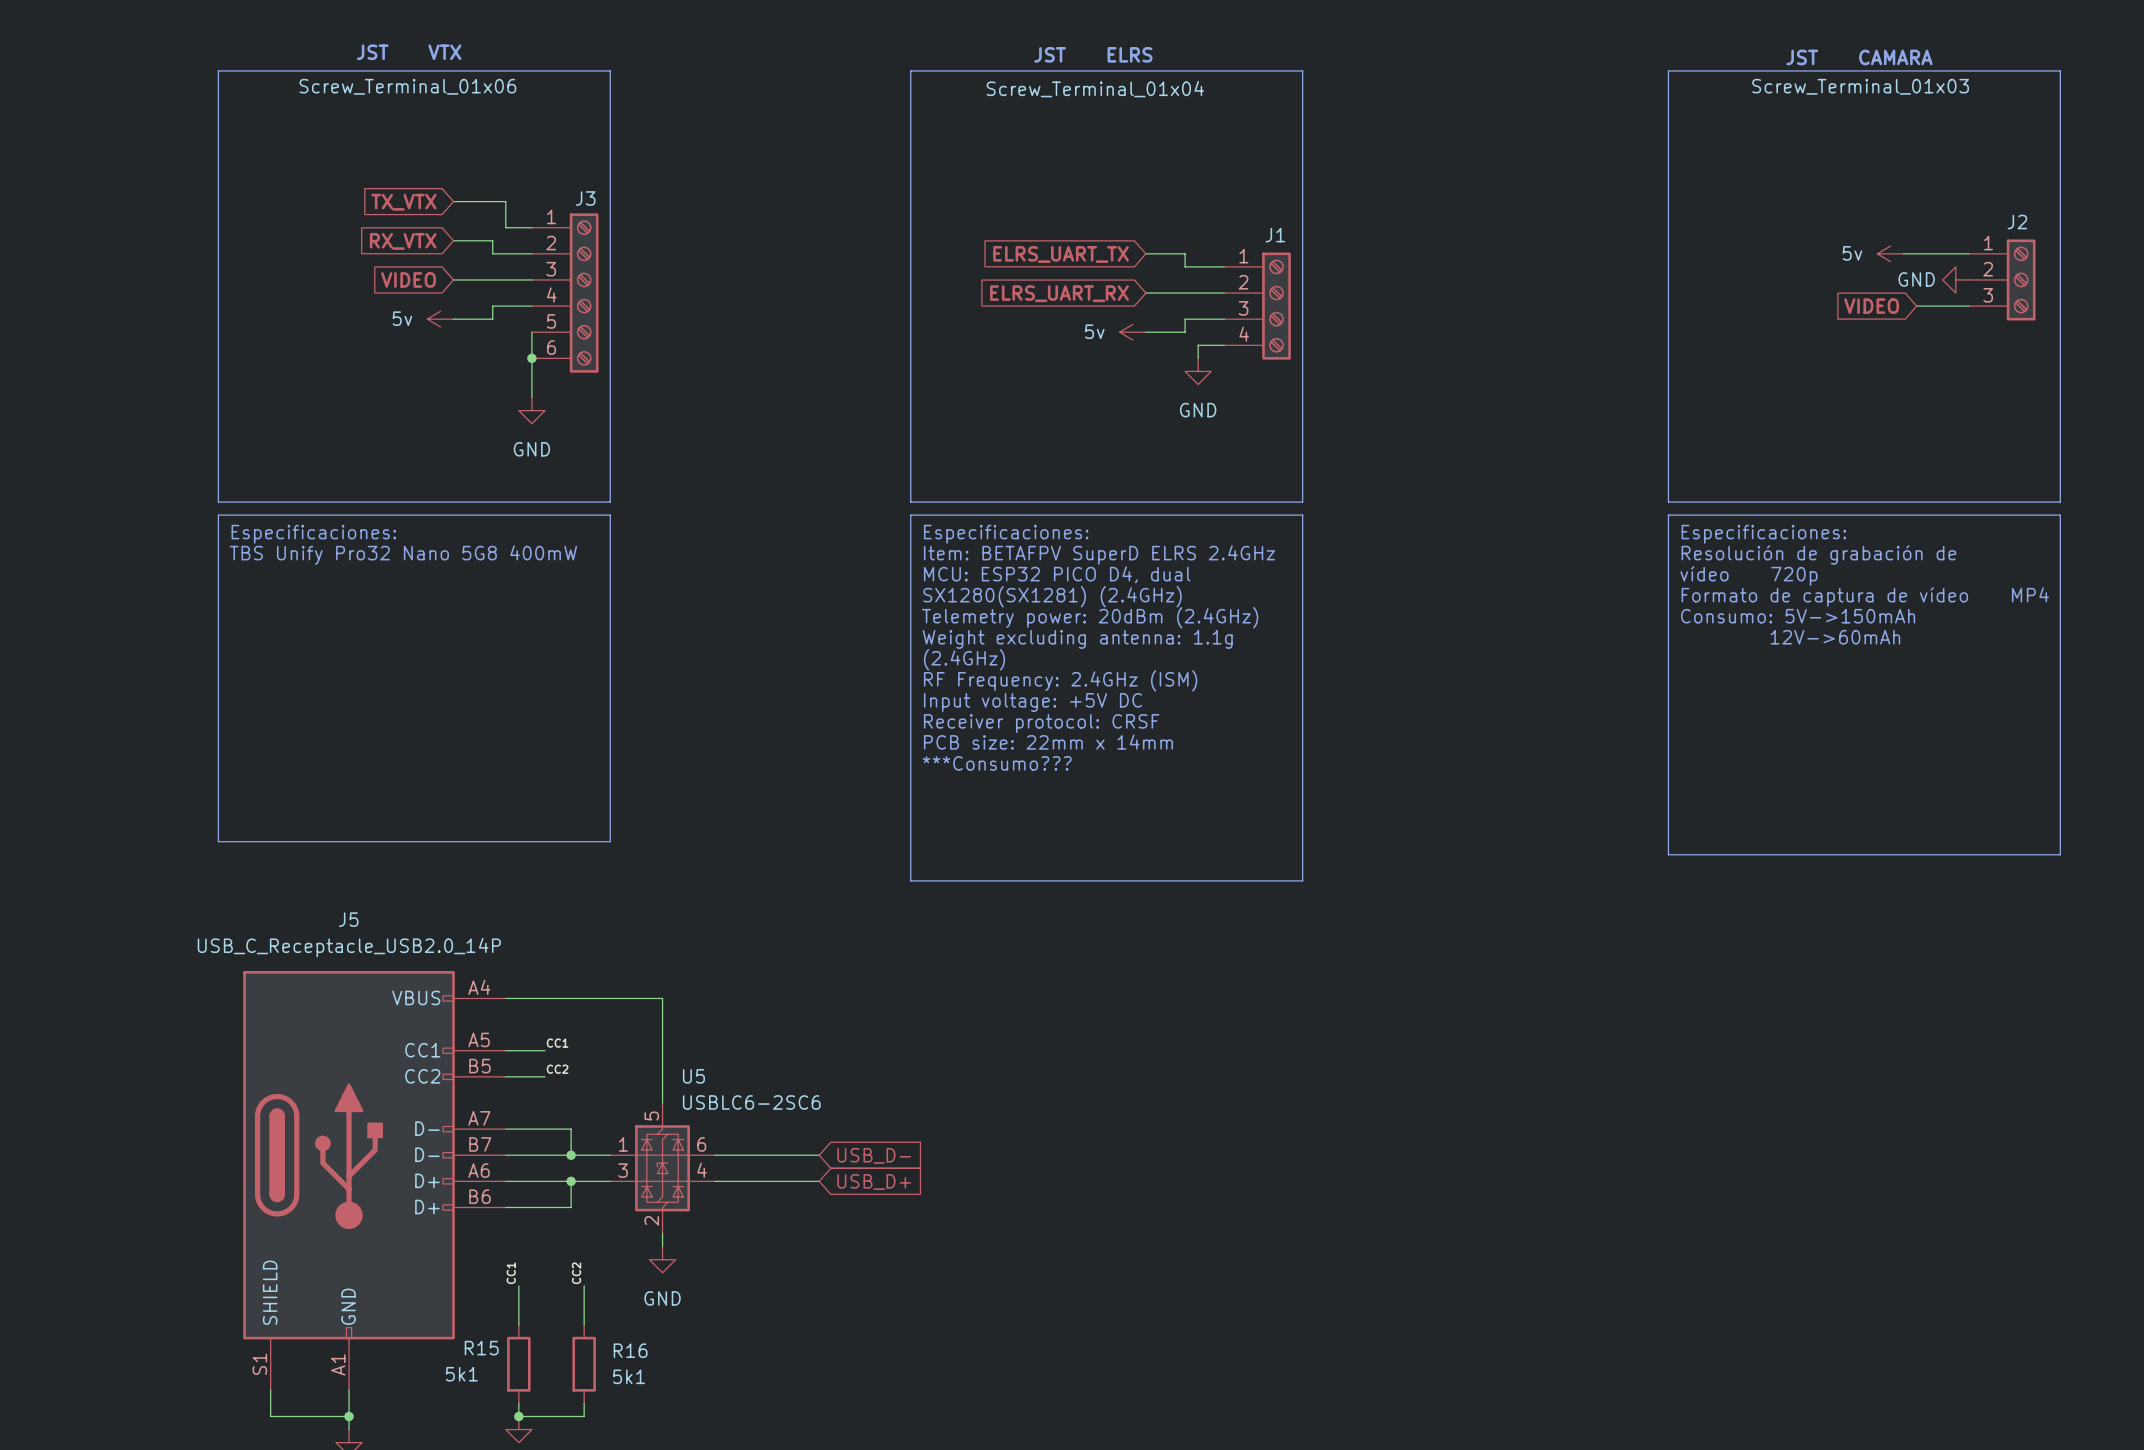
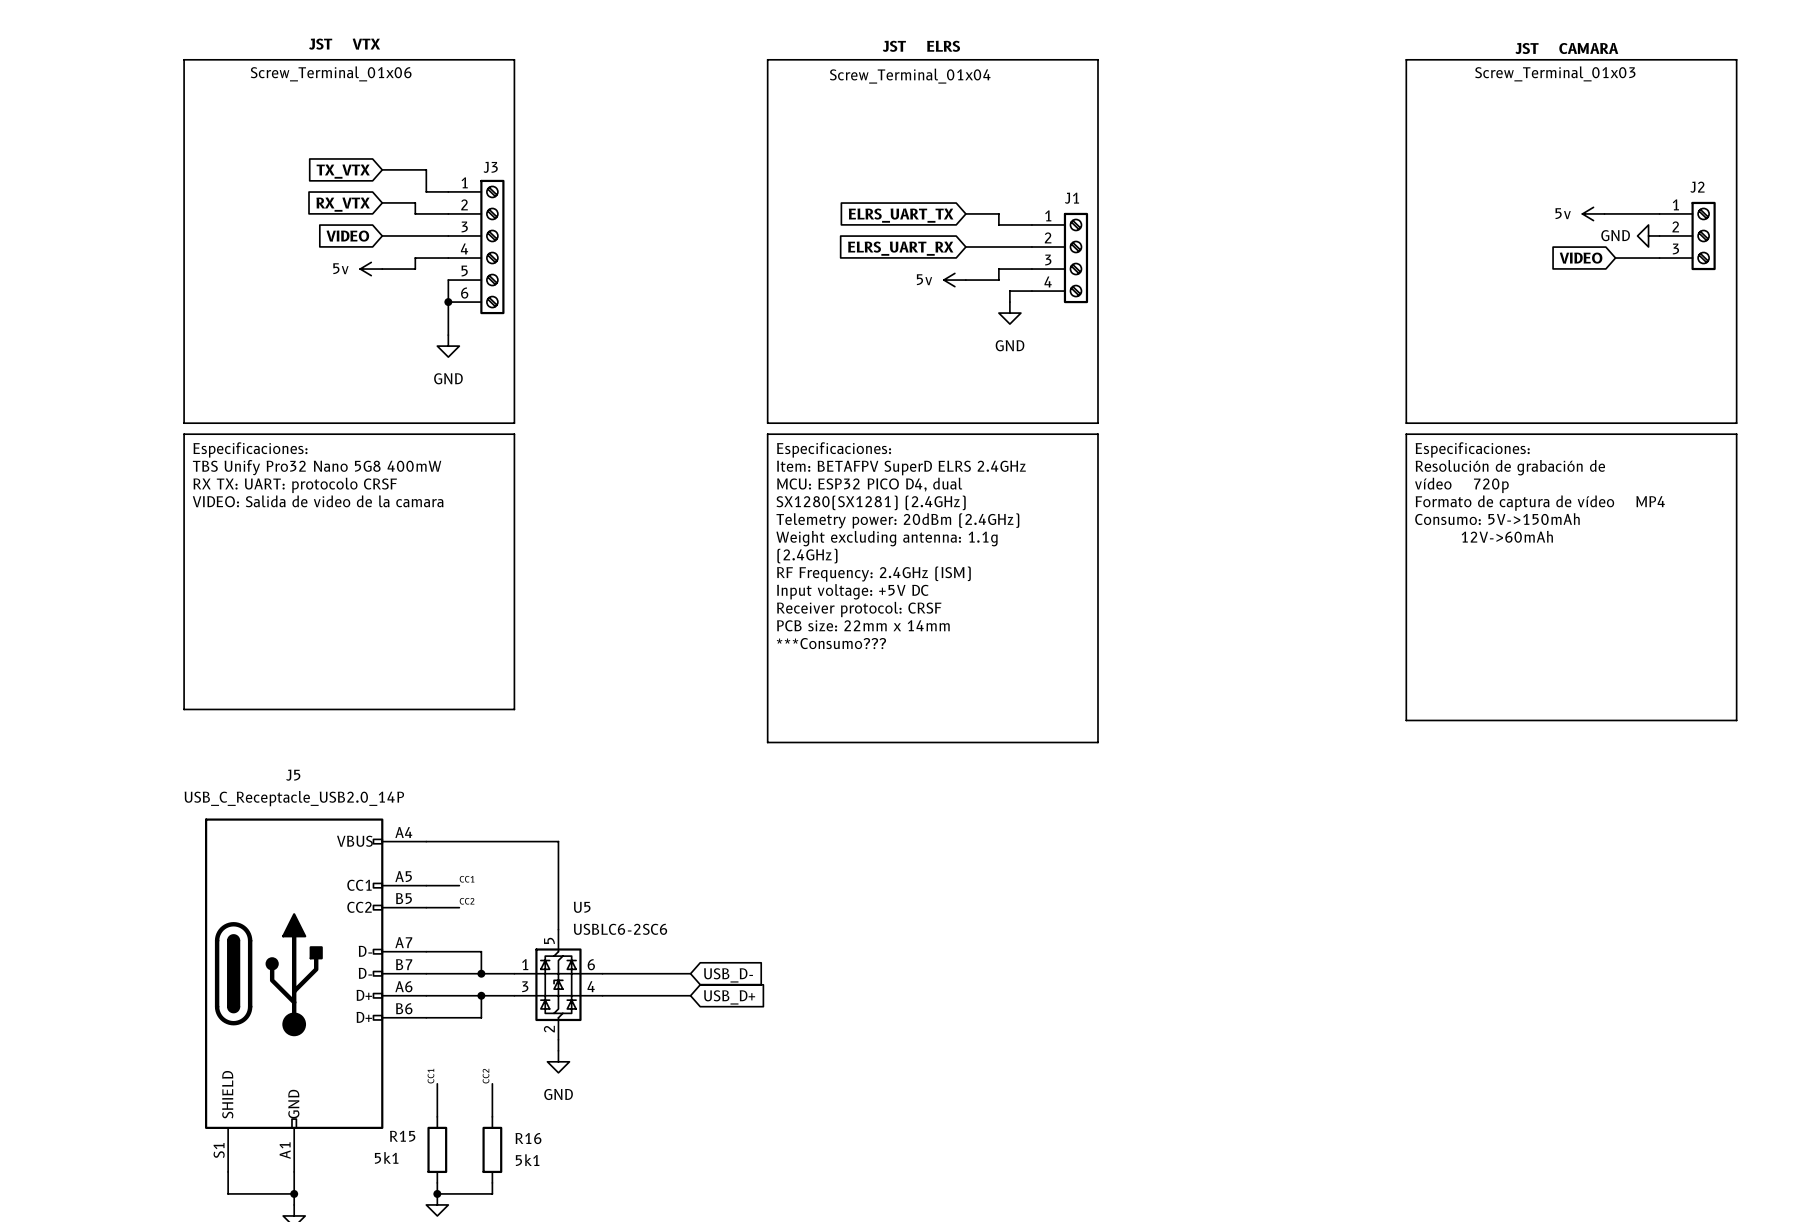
text: none -> RX TX: UART: protocolo CRSF (295, 485)
text: none -> VIDEO: Salida de video de la camara (318, 501)

